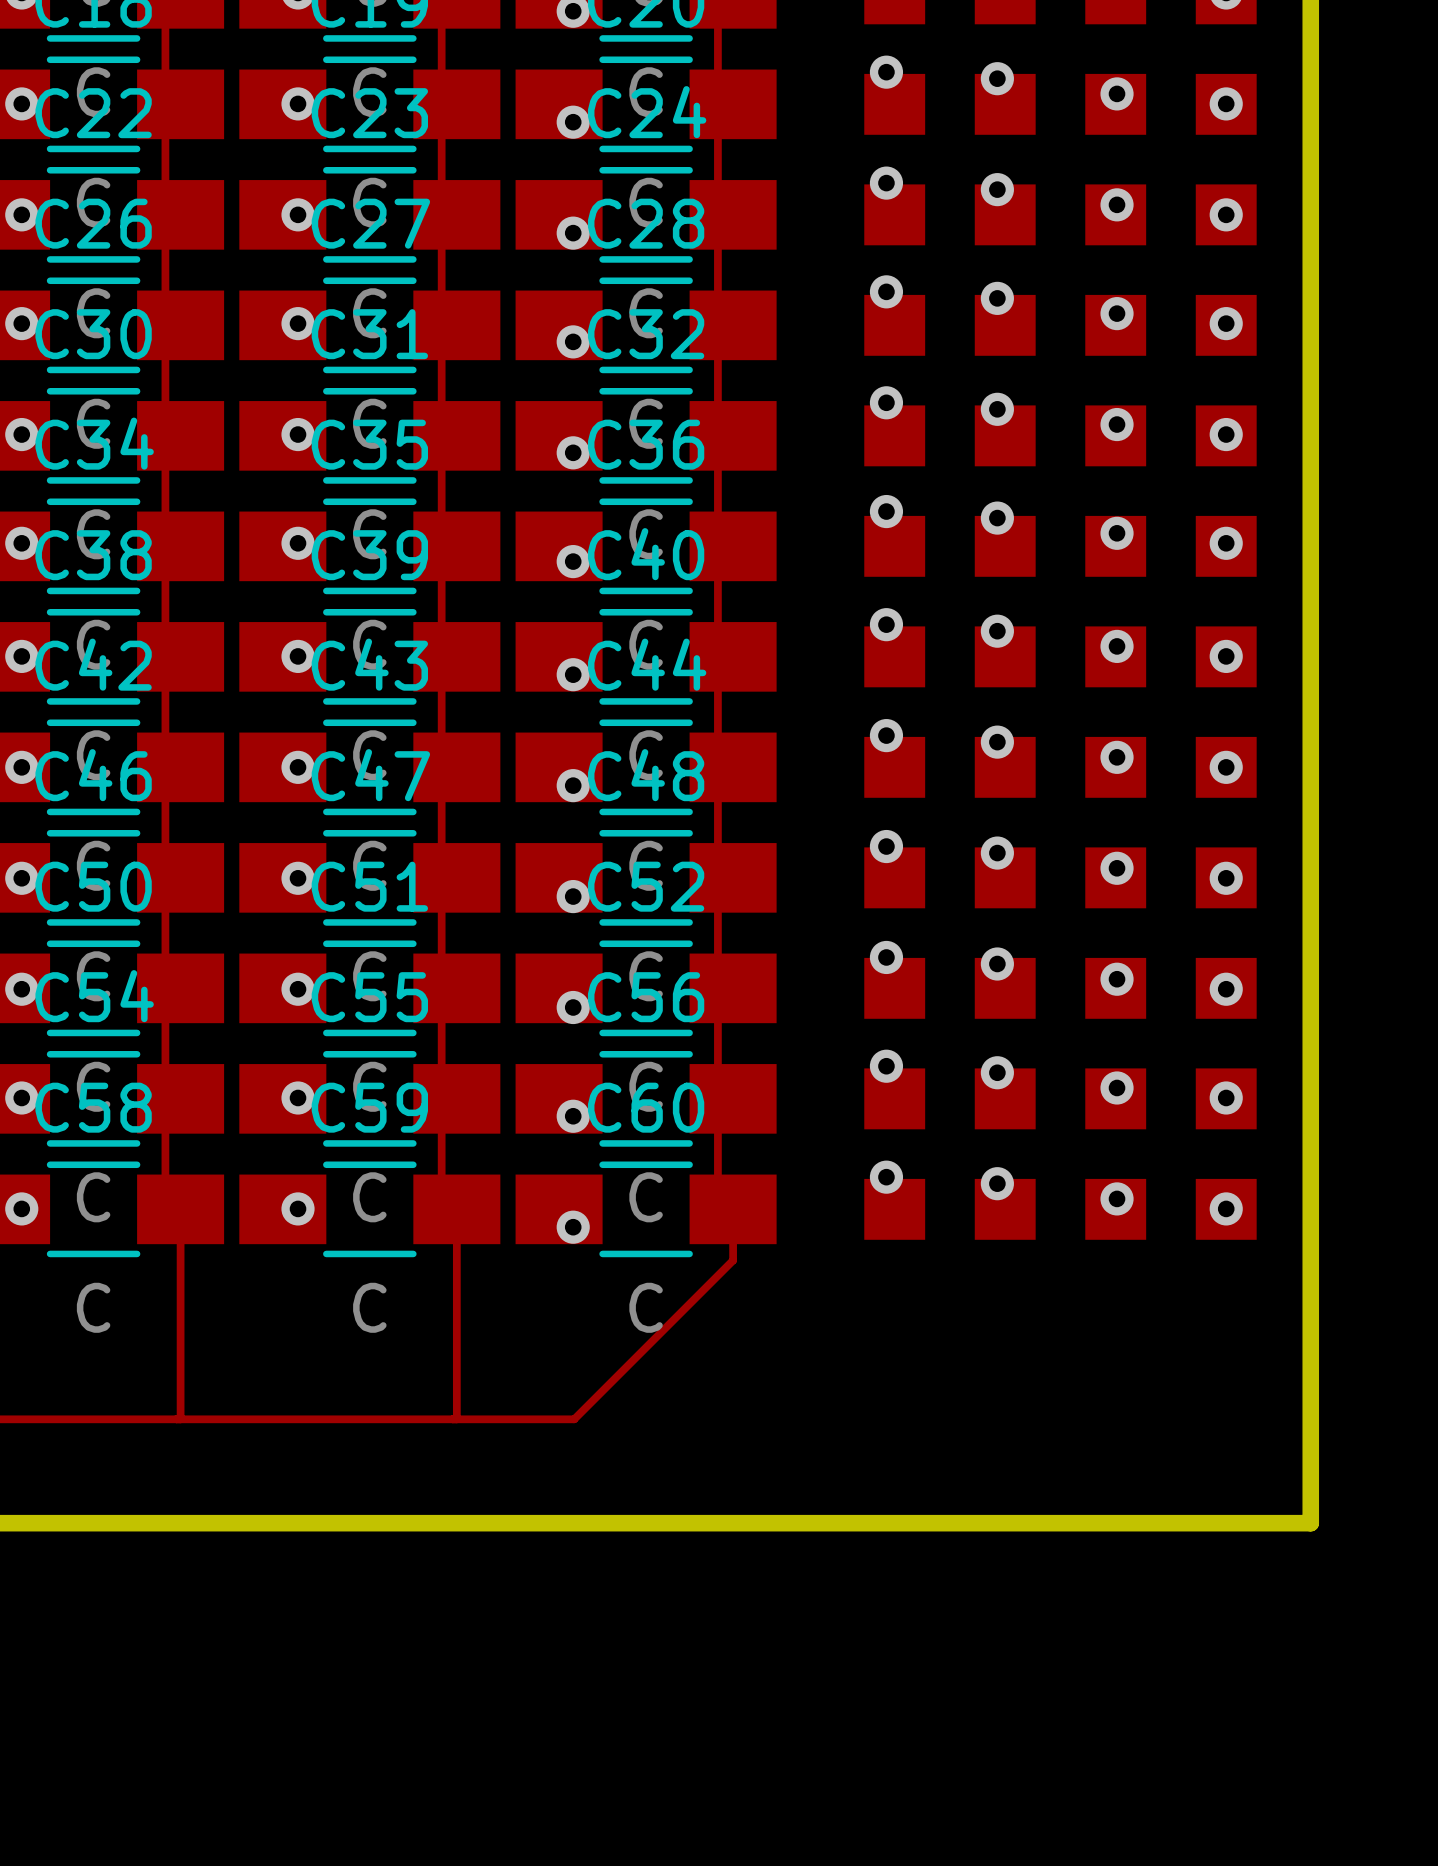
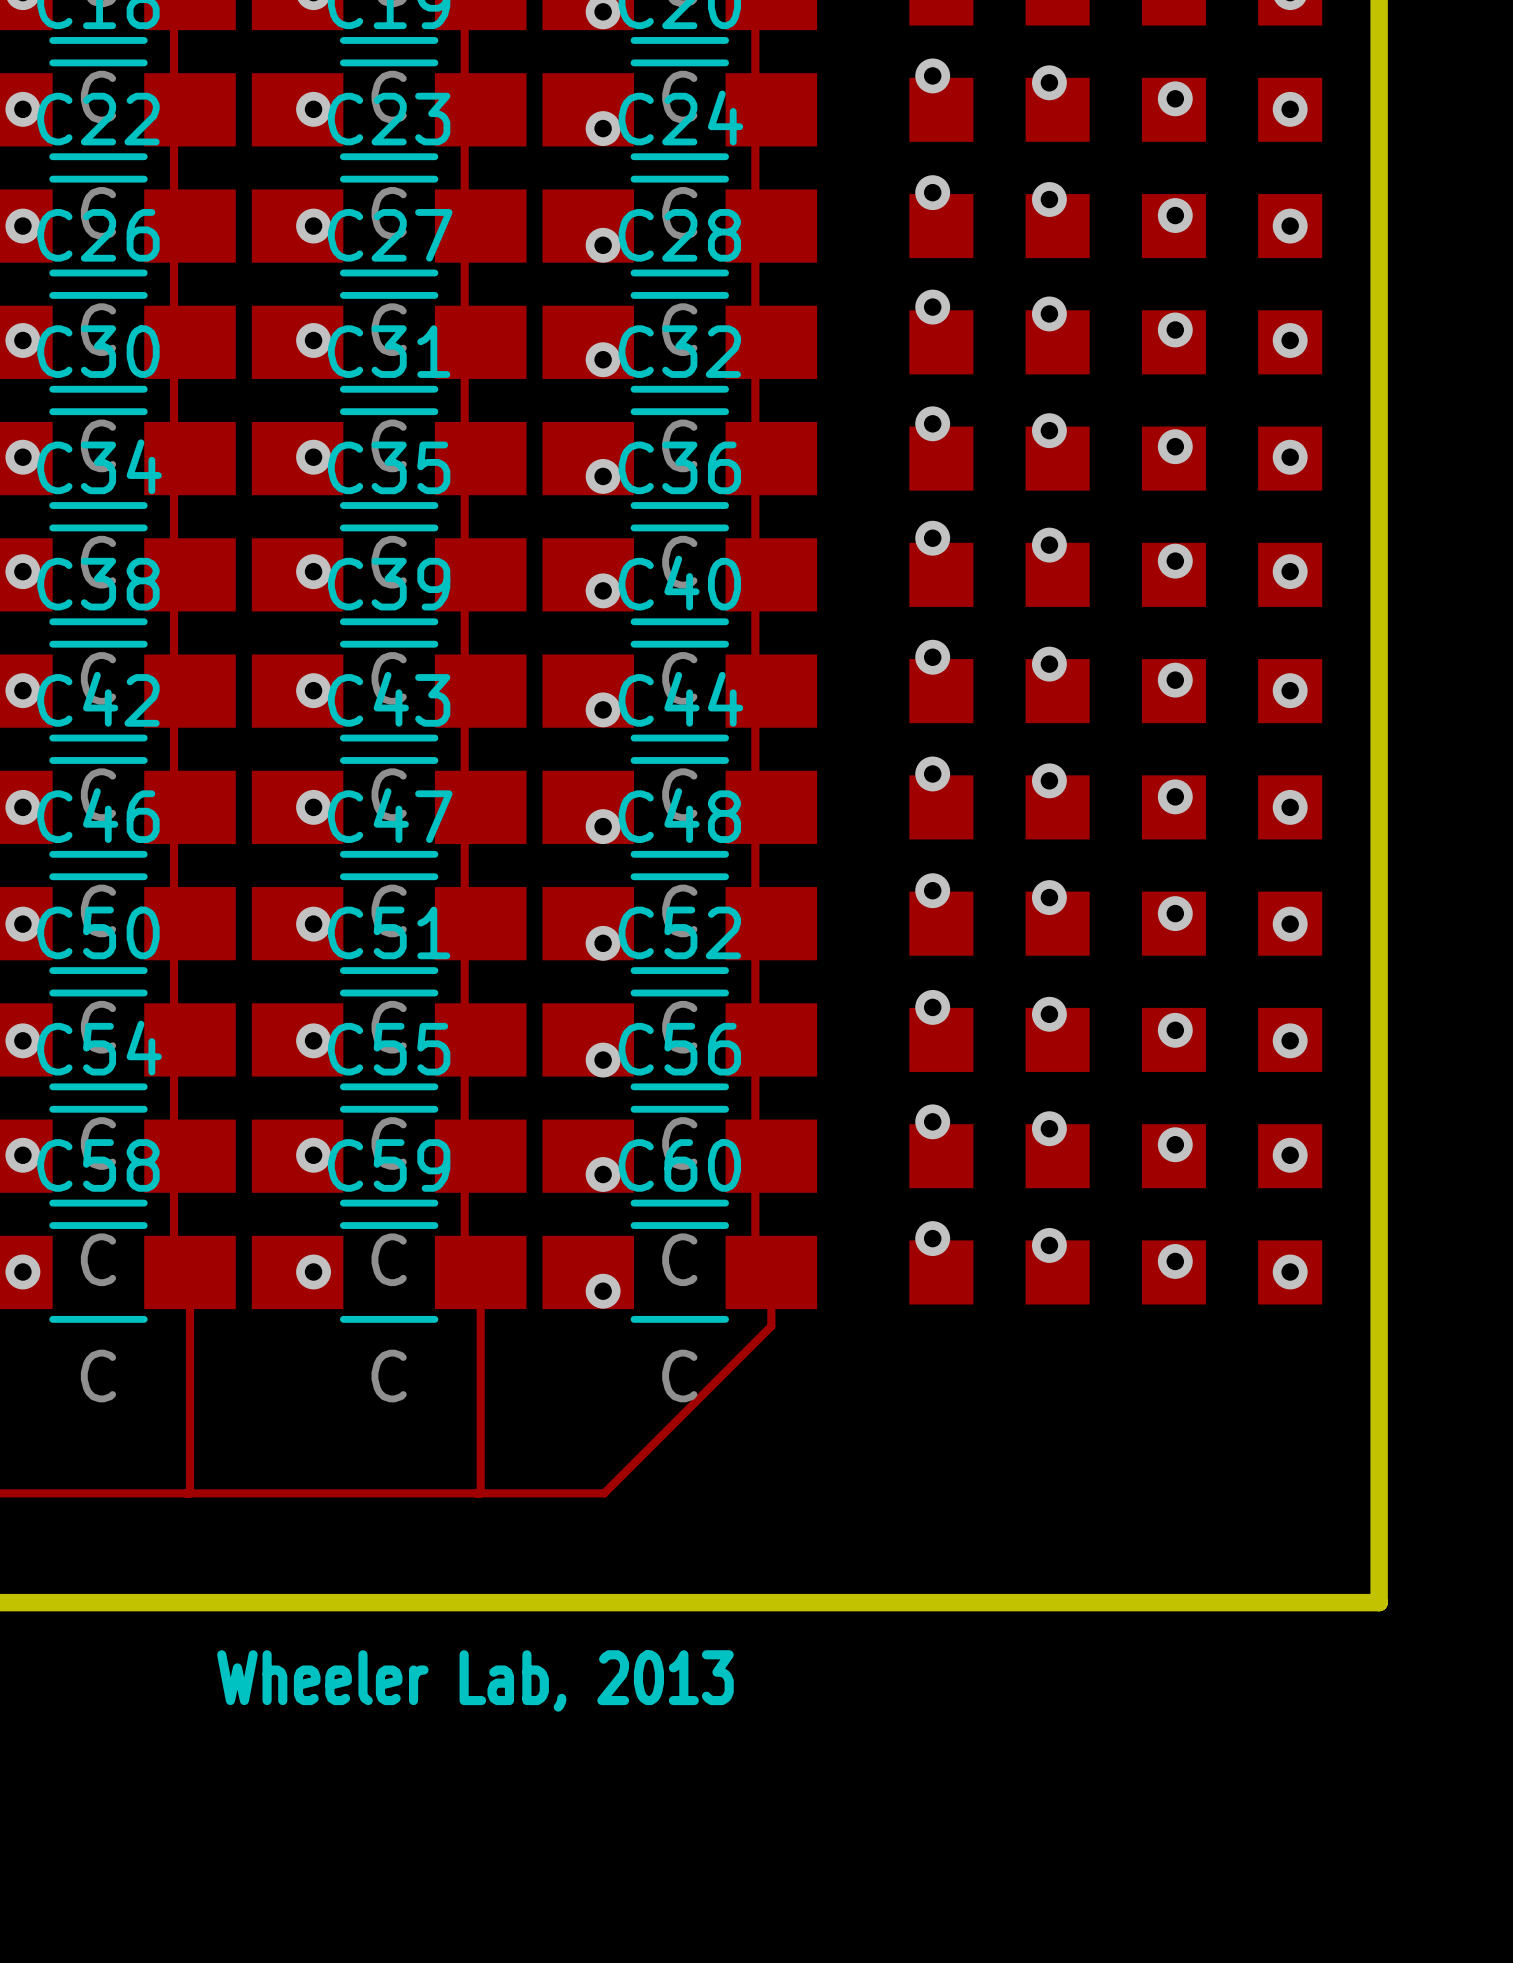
text: none -> Wheeler Lab, 2013 (475, 1680)

